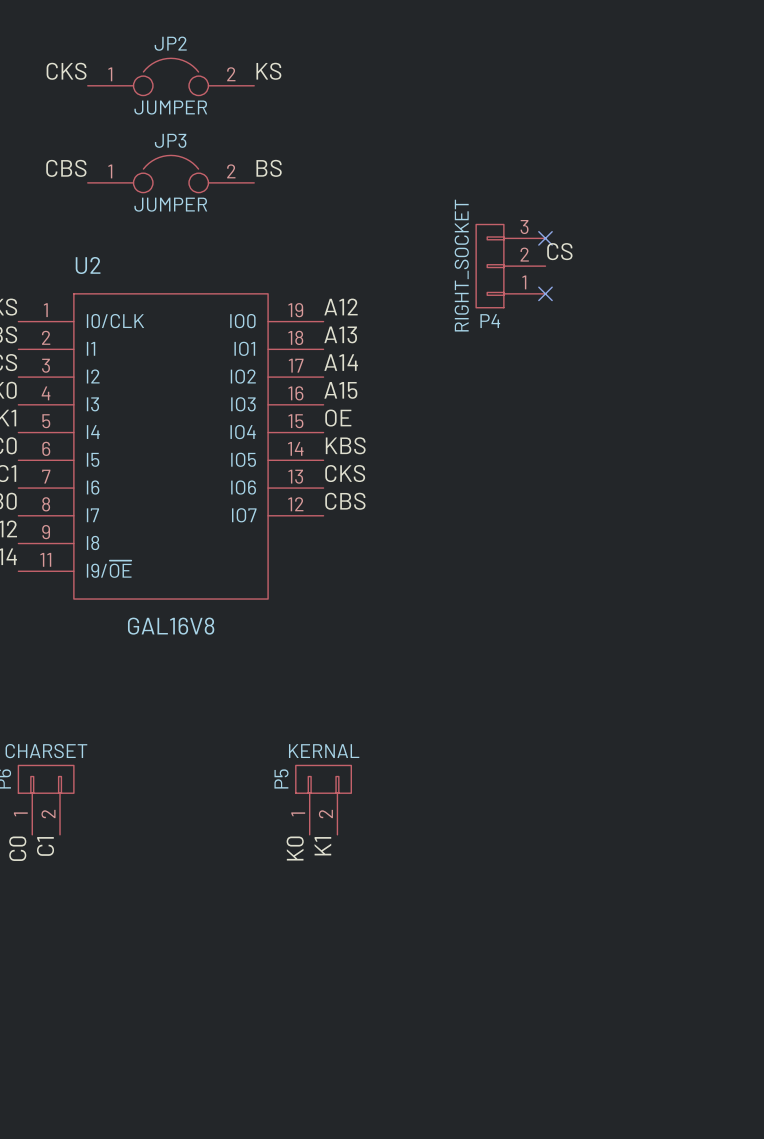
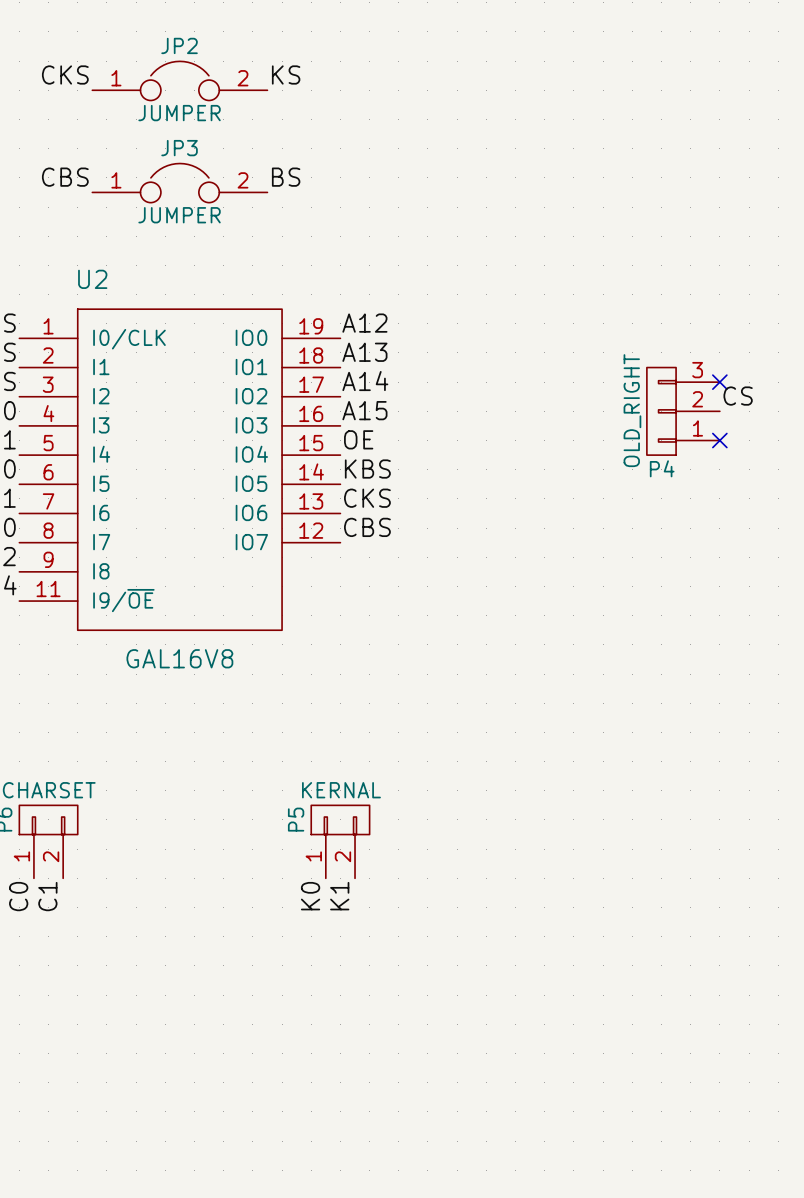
no-connect mark: (545, 238) -> none
label position: CS (559, 251) -> CS (738, 396)
P4 value: RIGHT_SOCKET (461, 265) -> OLD_RIGHT (632, 410)
P4 position: (510, 266) -> (683, 411)
no-connect mark: (545, 293) -> none
no-connect mark: none -> (719, 382)
no-connect mark: none -> (719, 440)

